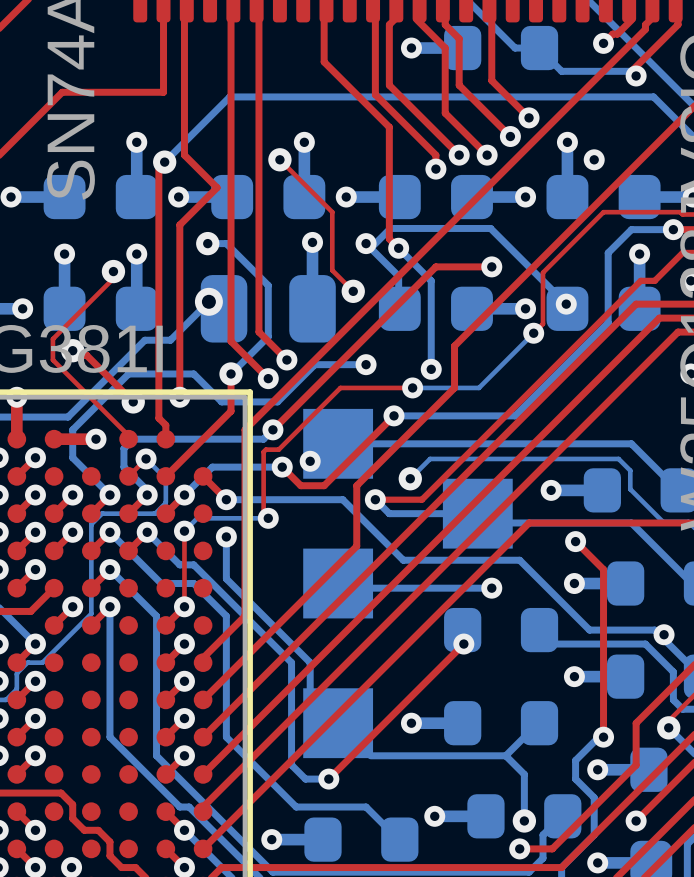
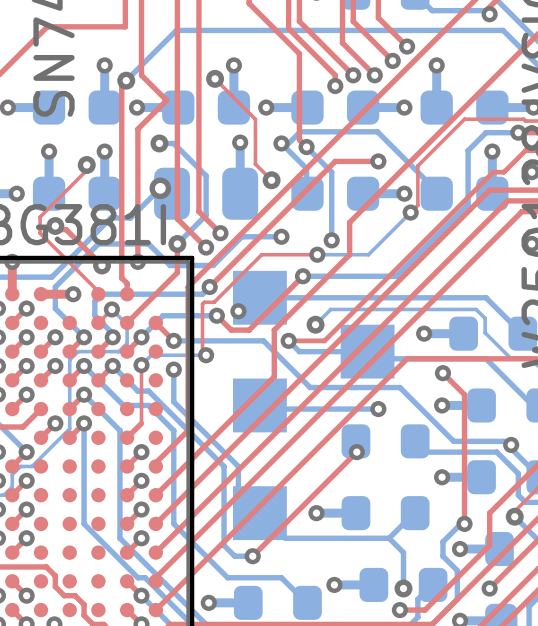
via: (594, 159) -> none
via: (566, 304) -> none
via: (184, 606) -> none

